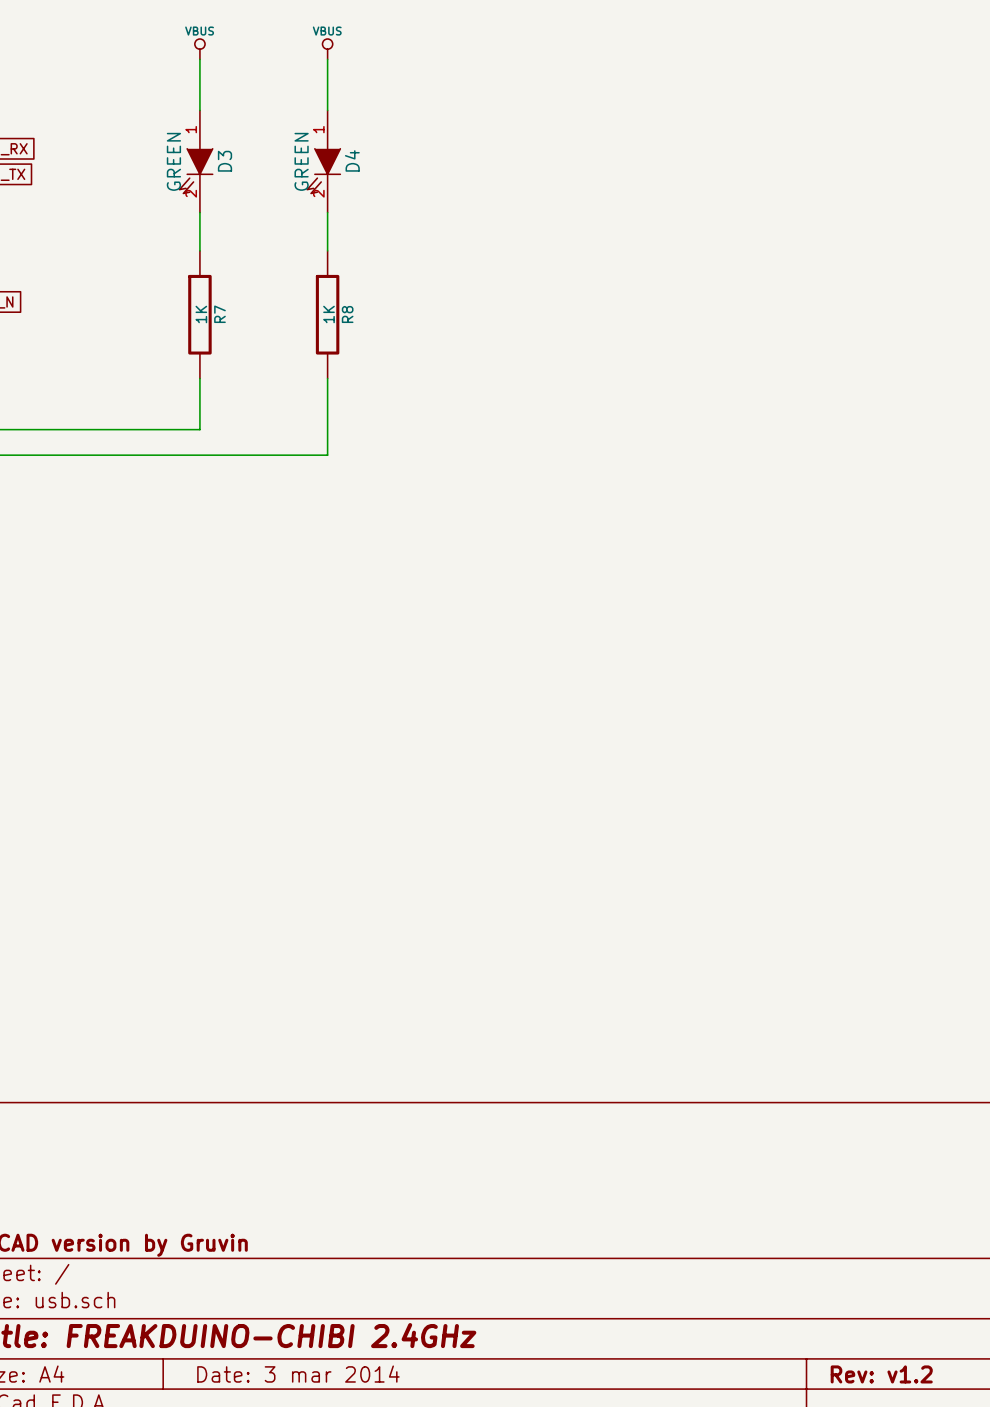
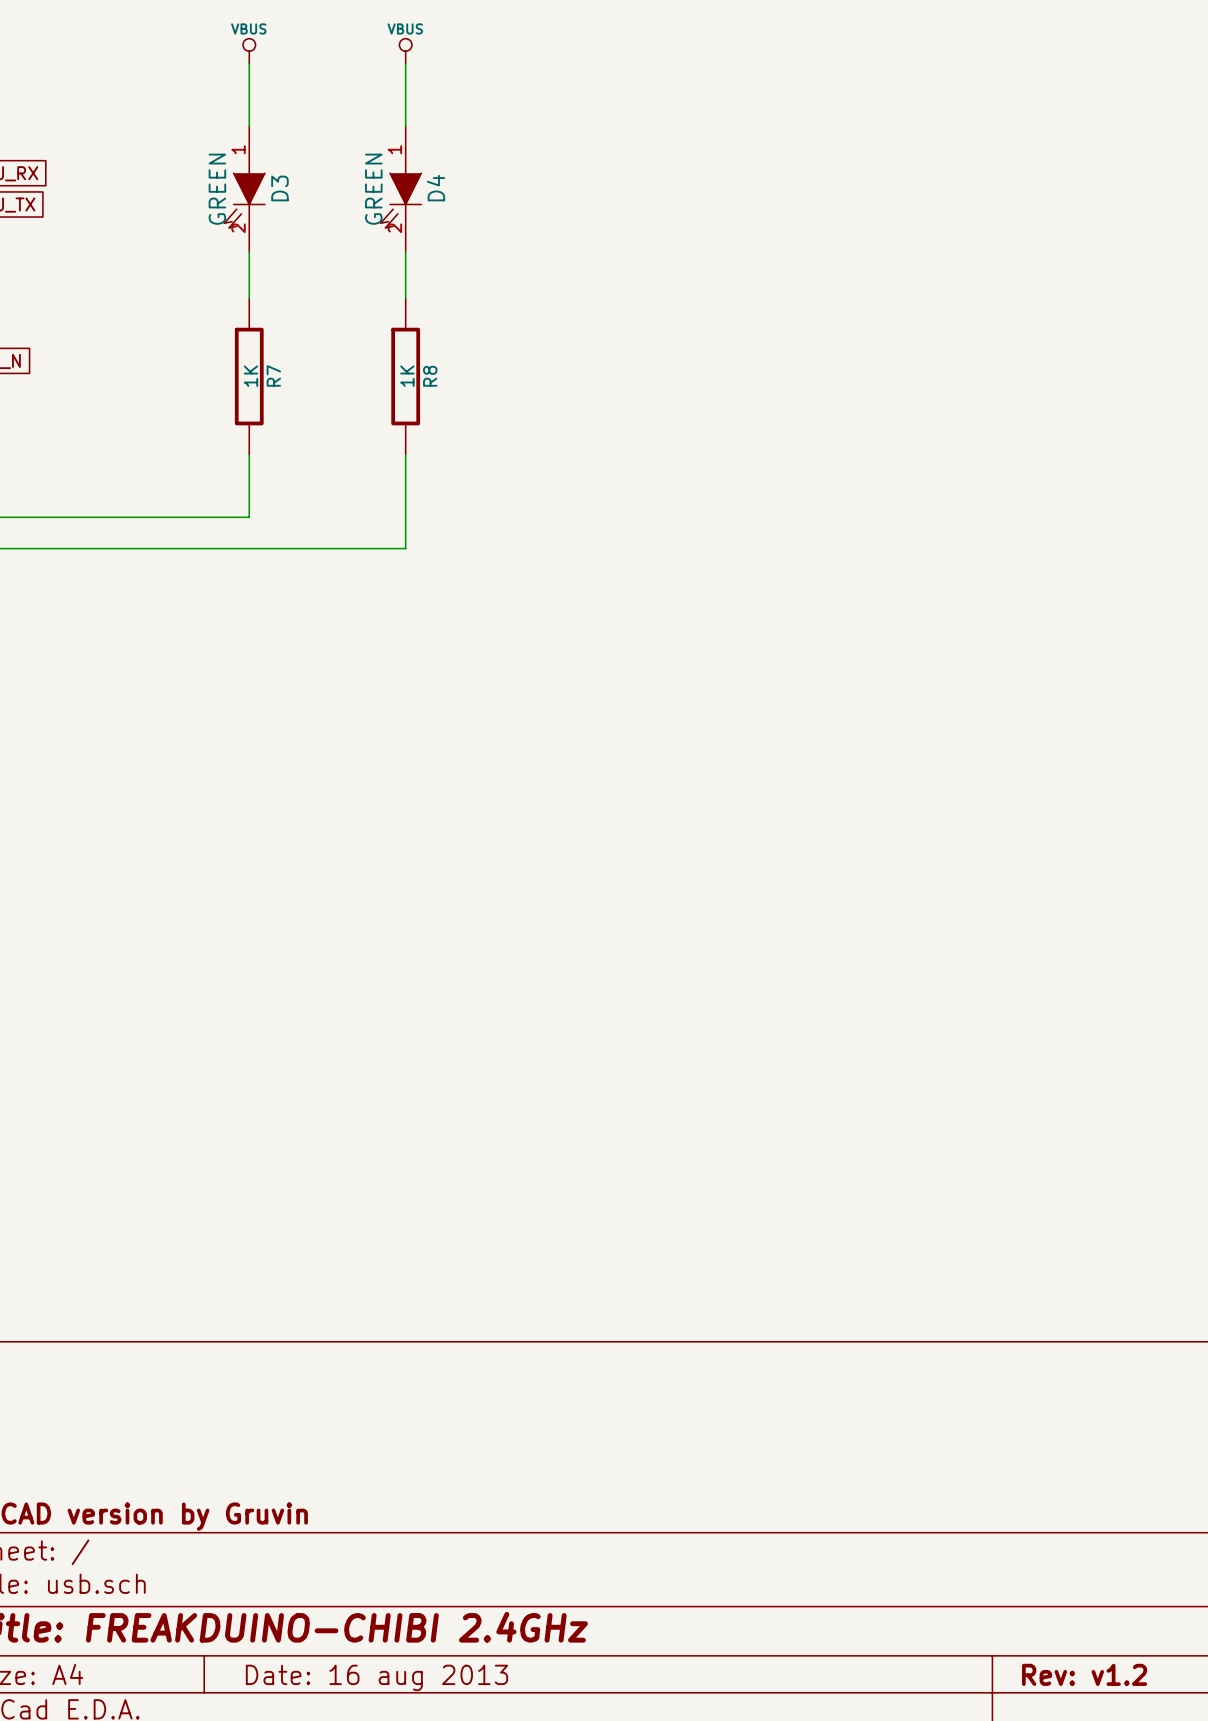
title block: Date: 3 mar 2014 (298, 1374) -> Date: 16 aug 2013 (377, 1677)

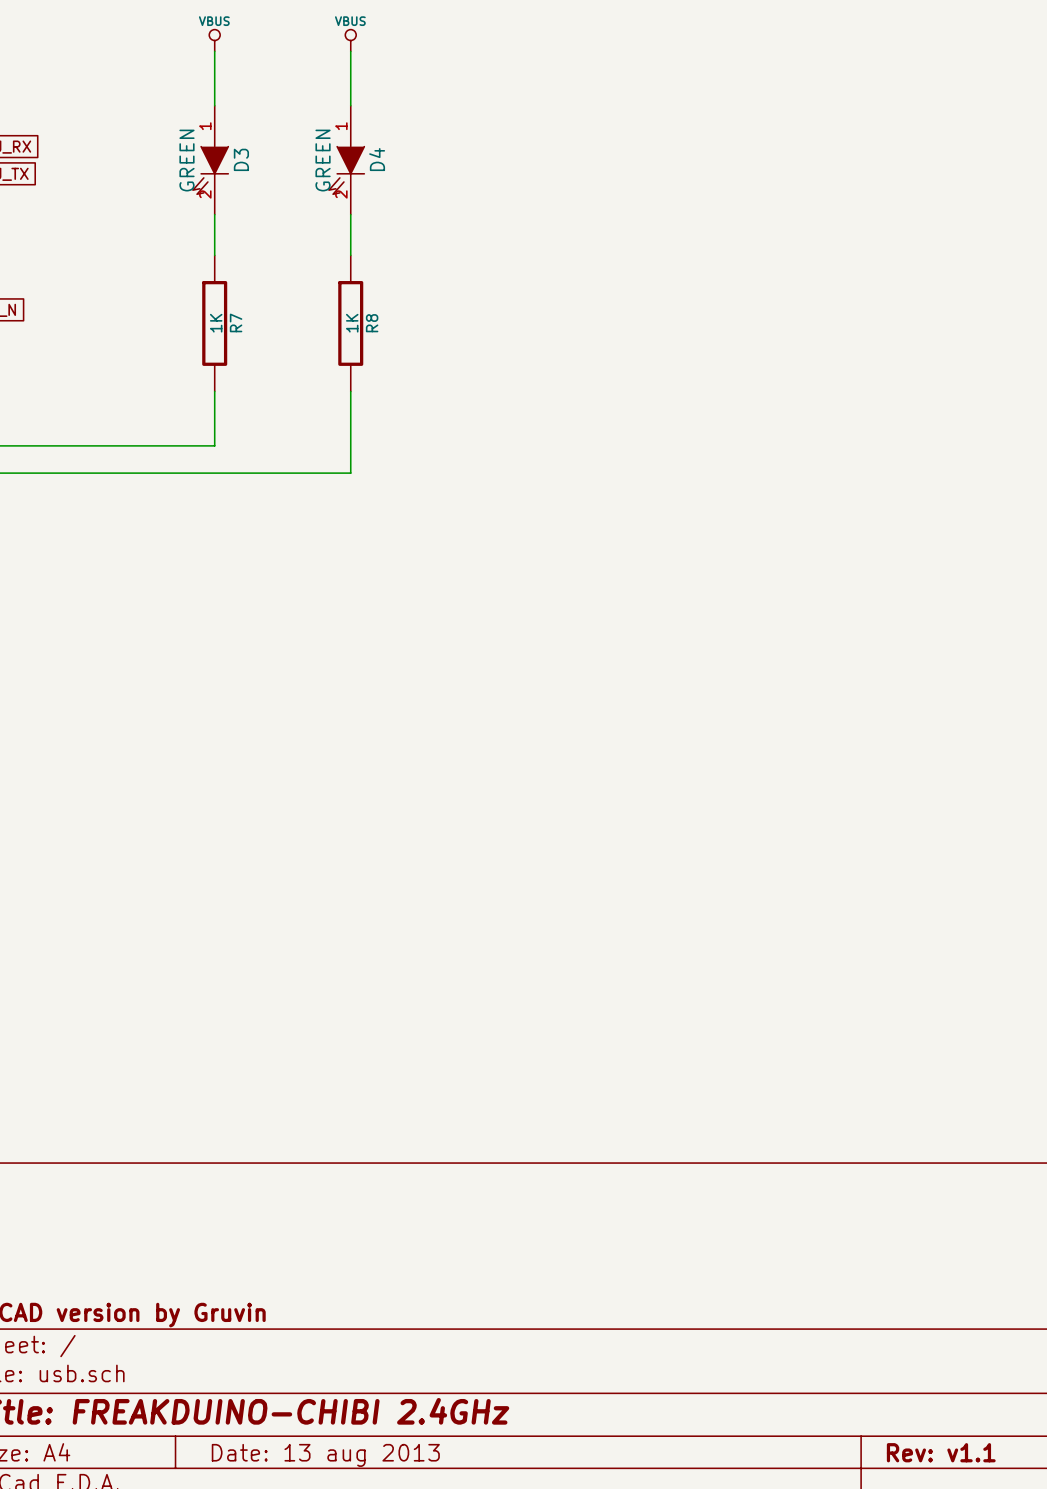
title block: Rev: v1.2 (1084, 1674) -> Rev: v1.1 (941, 1452)
title block: Date: 16 aug 2013 (377, 1677) -> Date: 13 aug 2013 (325, 1455)

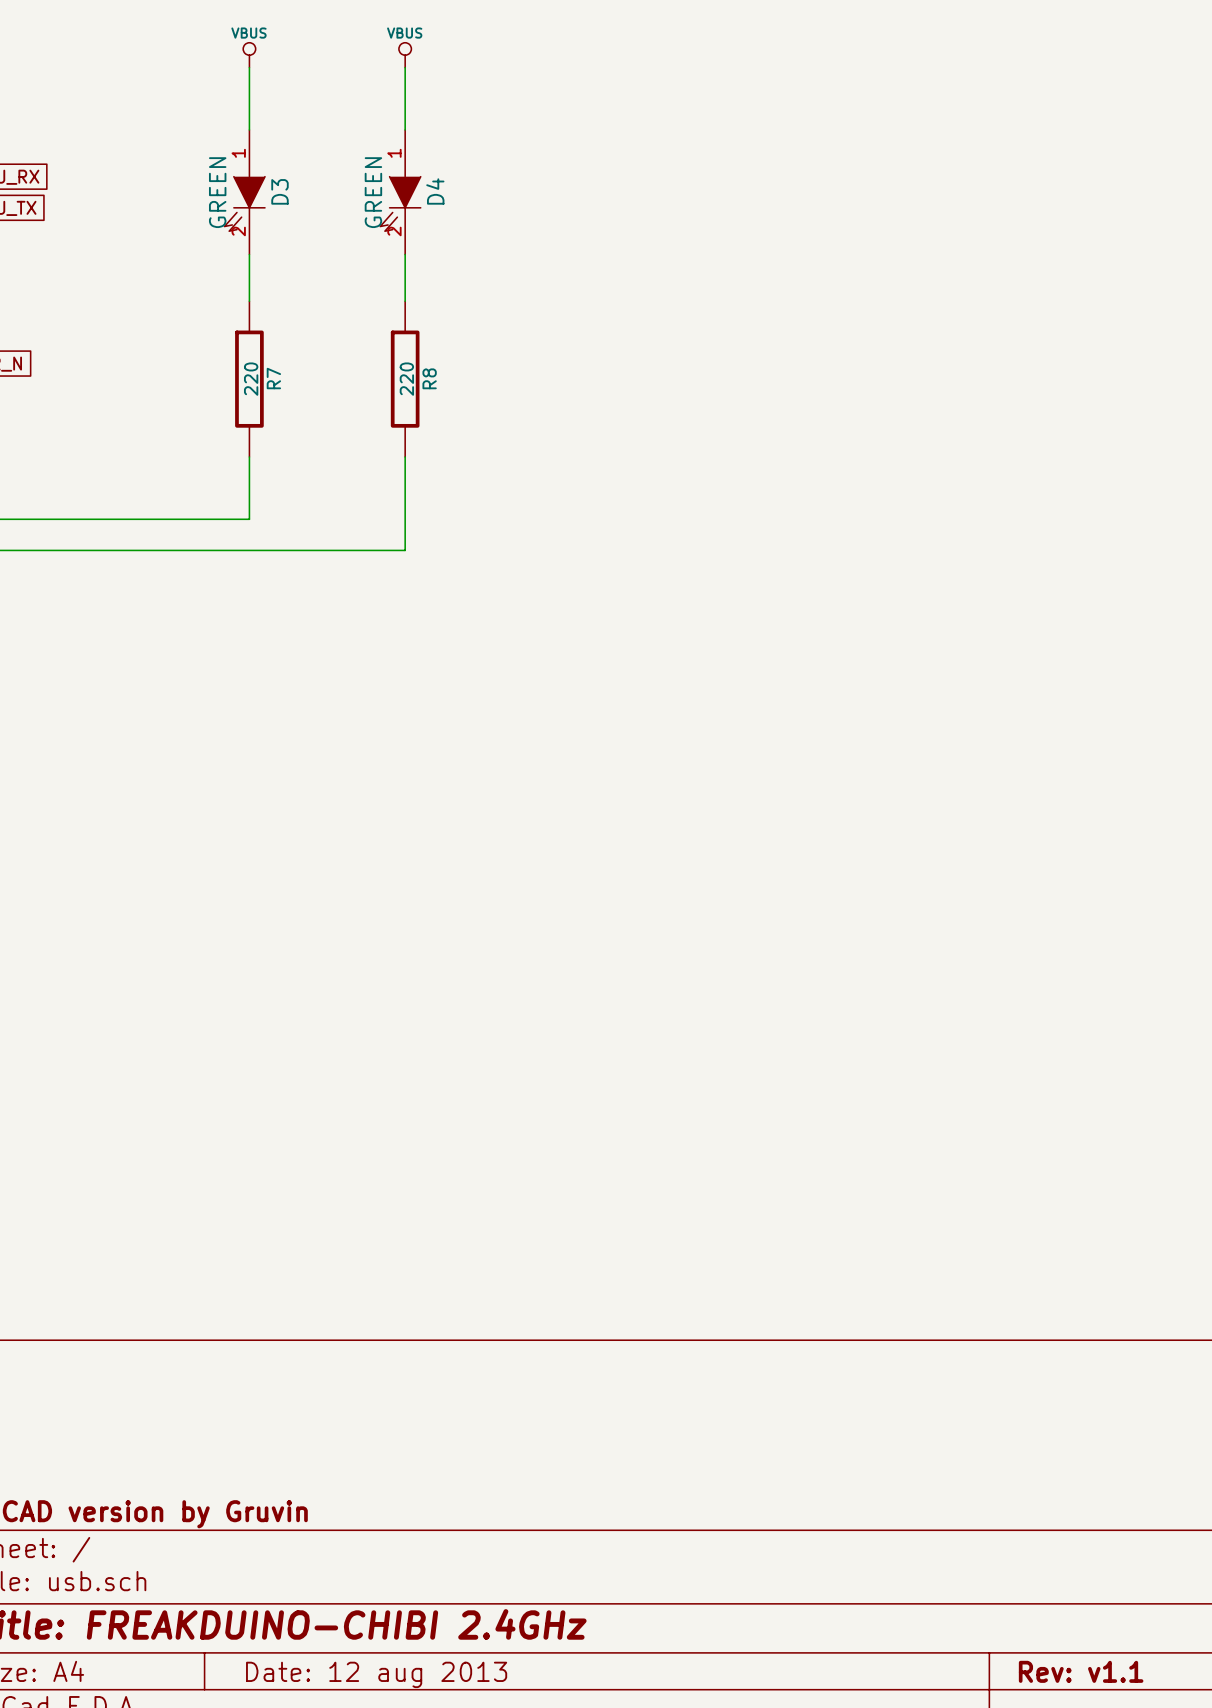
R7 value: 1K (216, 323) -> 220 (251, 379)
R8 value: 1K (352, 323) -> 220 (406, 379)
title block: Date: 13 aug 2013 (325, 1455) -> Date: 12 aug 2013 (376, 1674)

